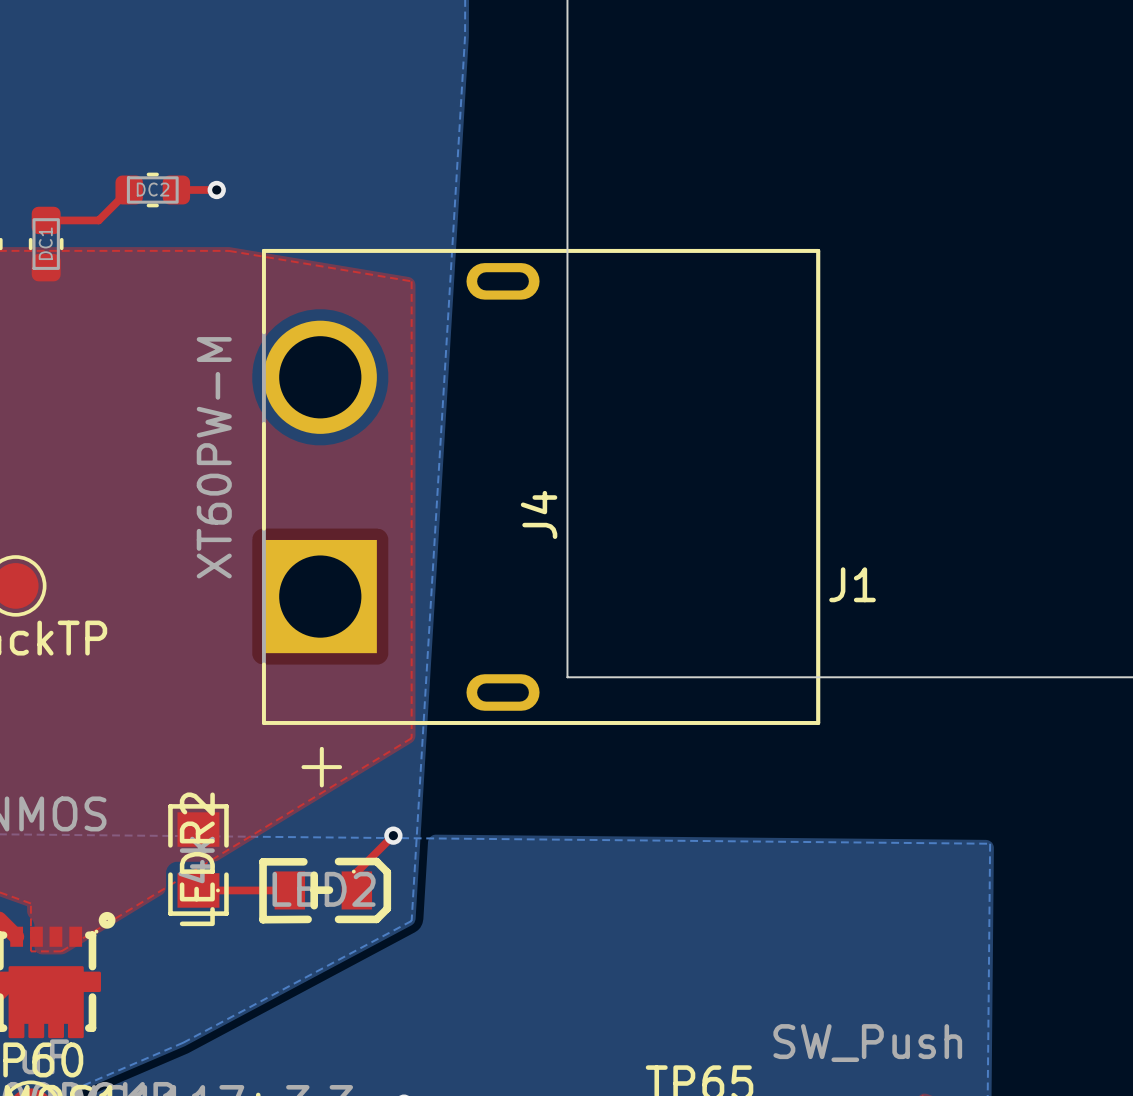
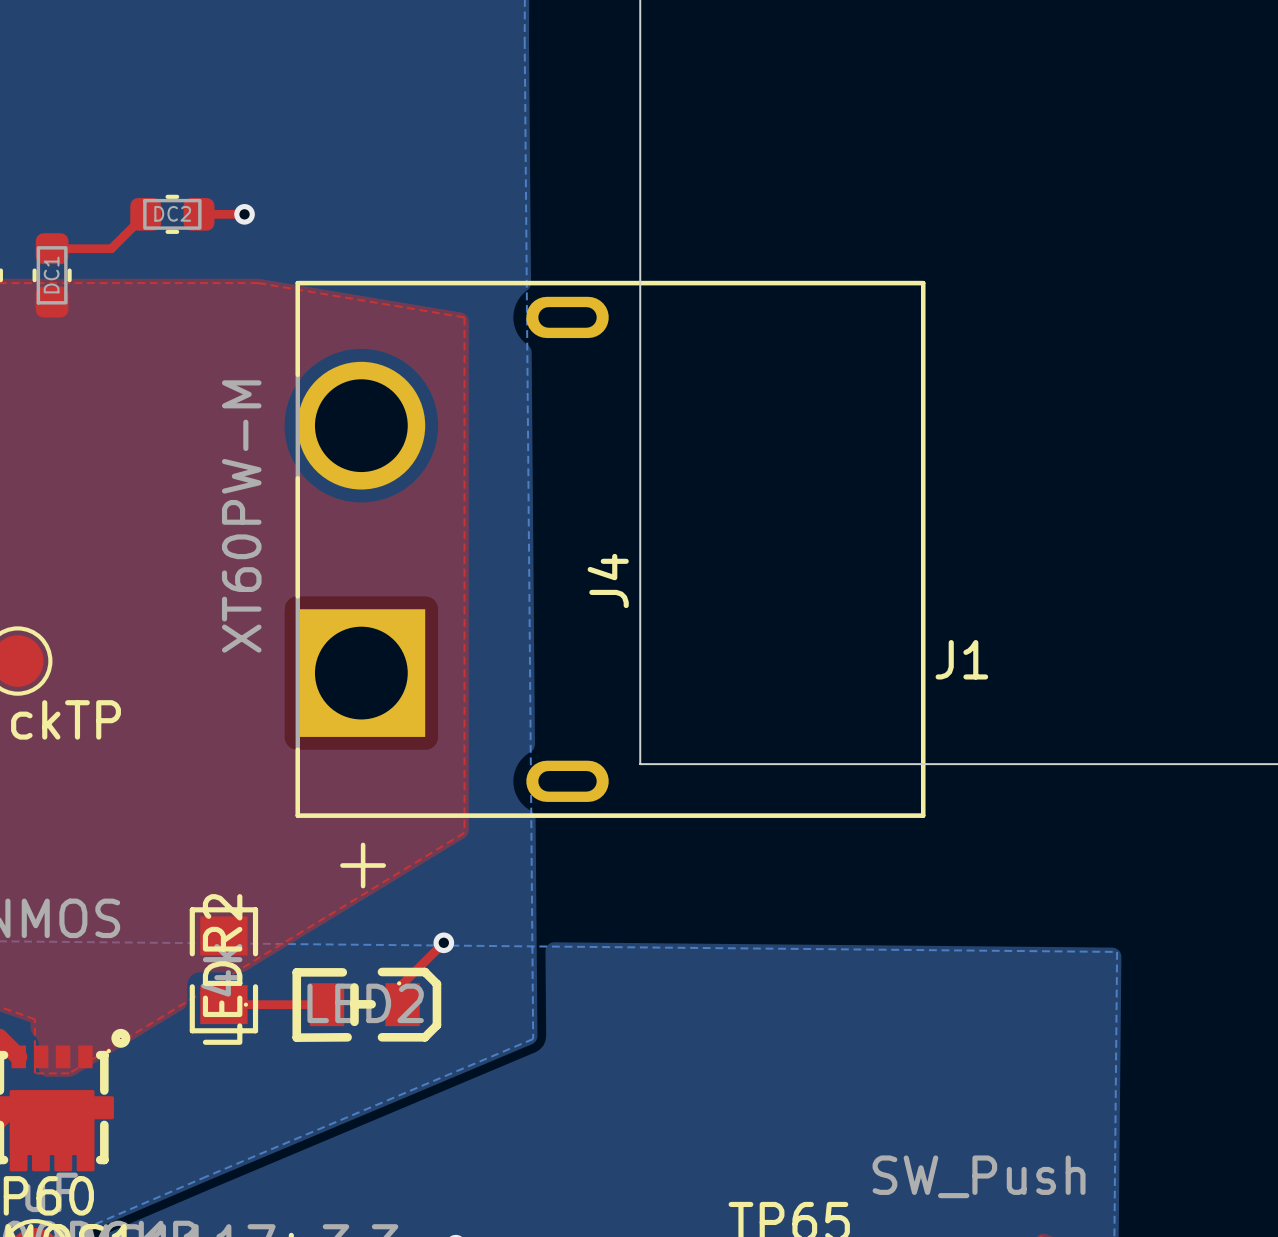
bottom zone outline: (465, 36) (411, 920) (183, 1042) -> (524, 41) (533, 1039) (206, 1176)

